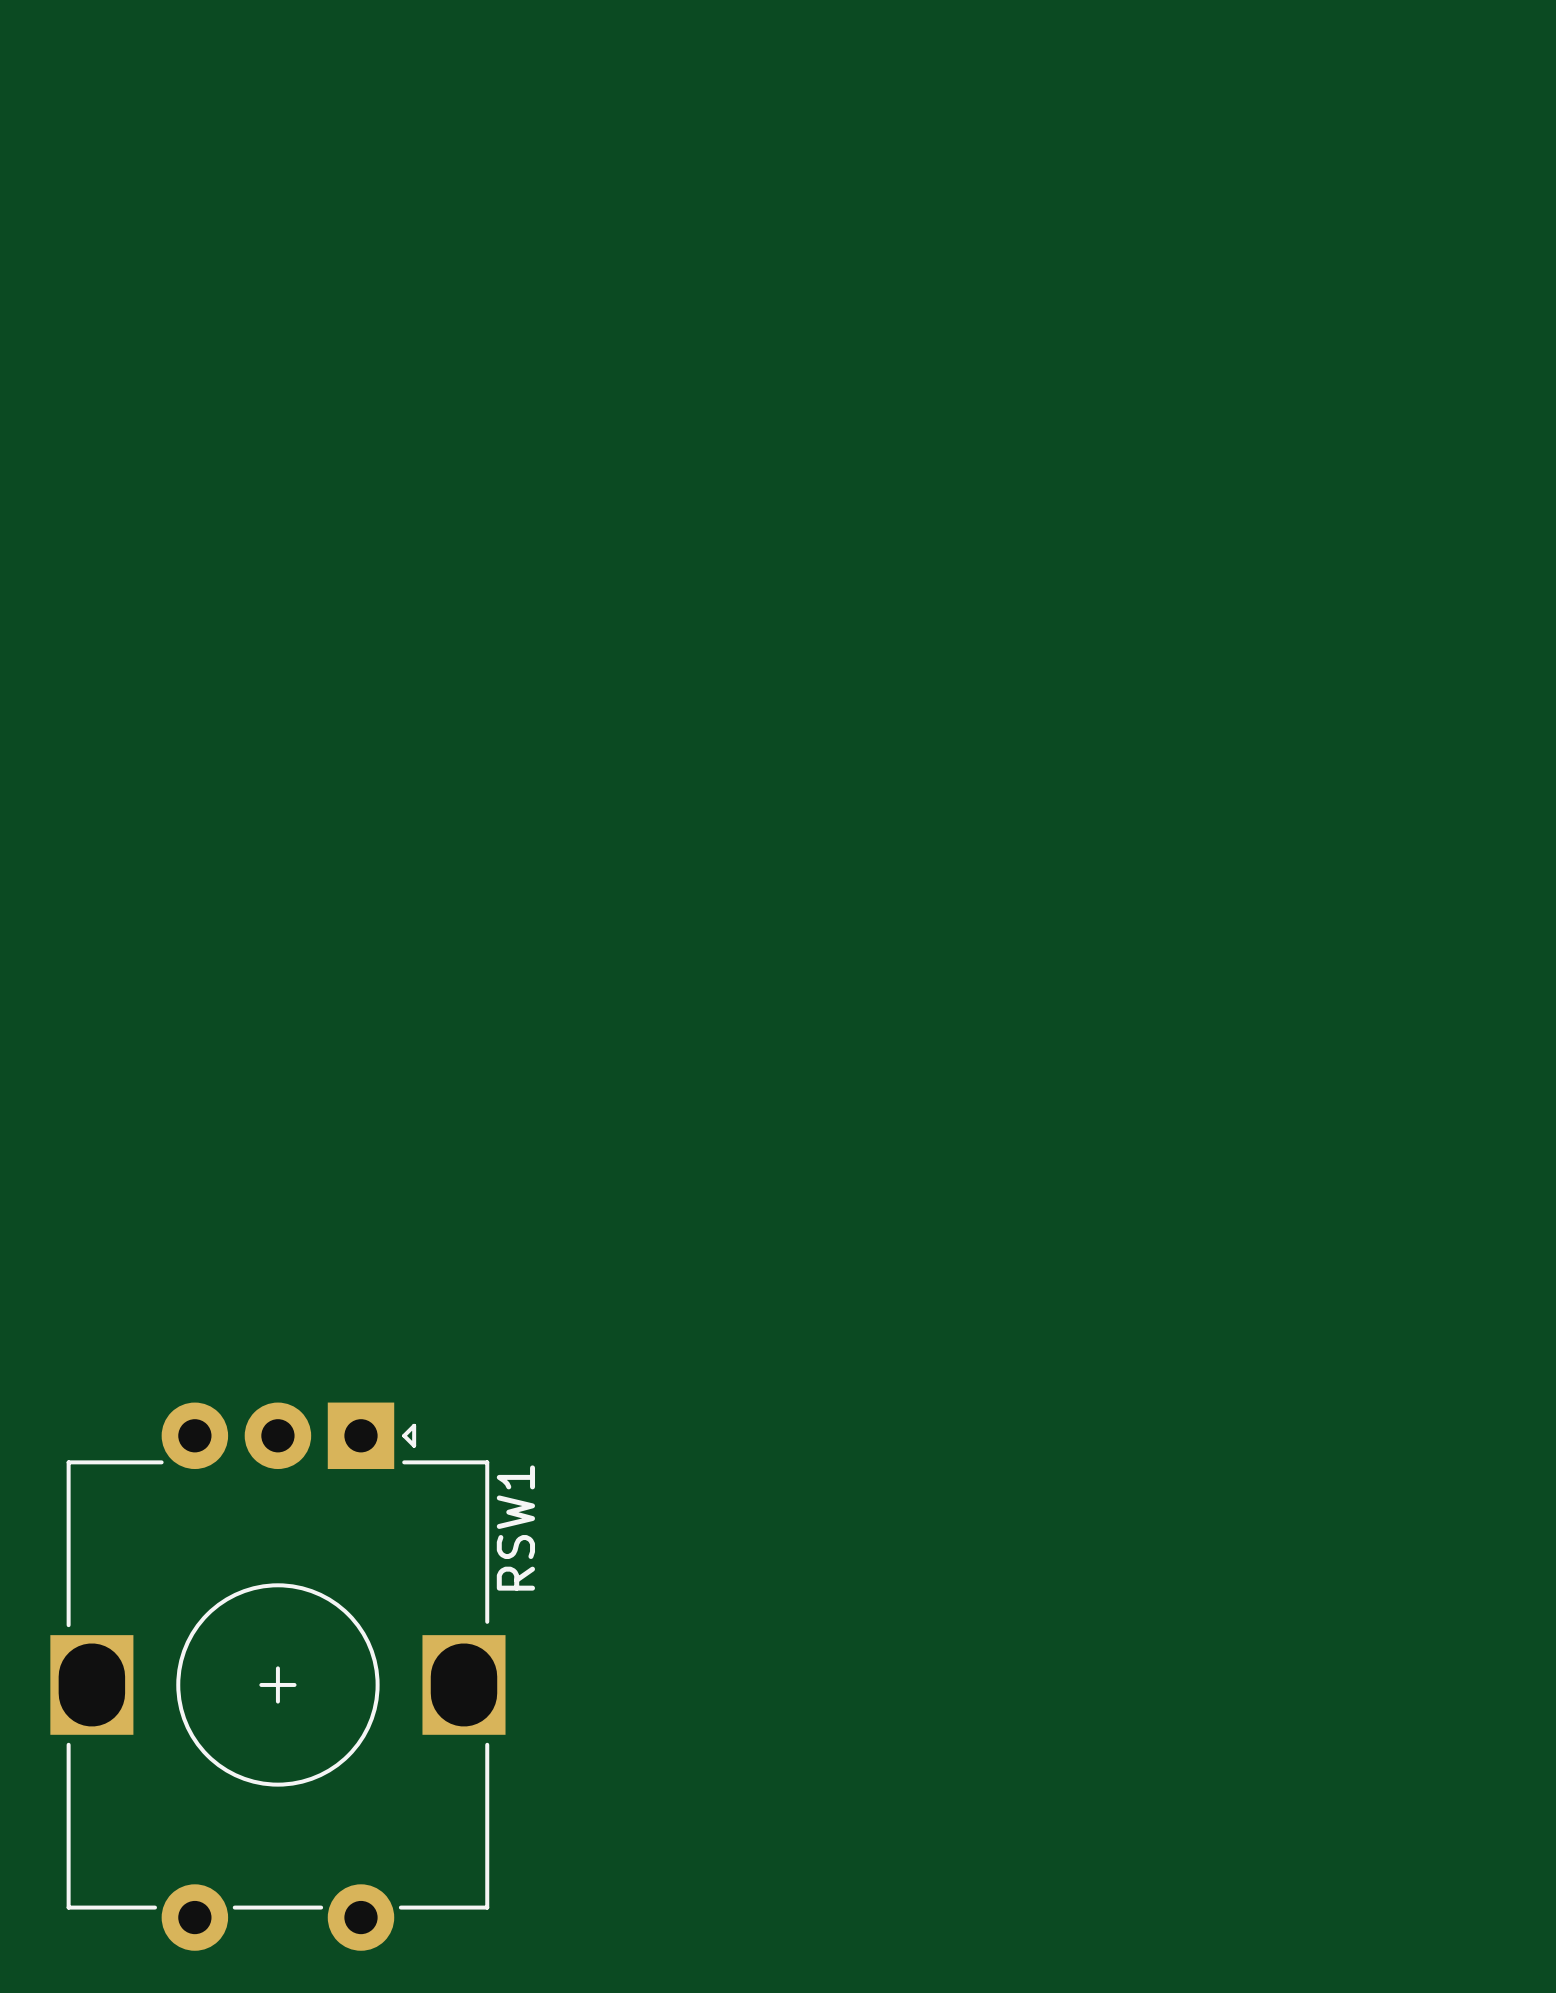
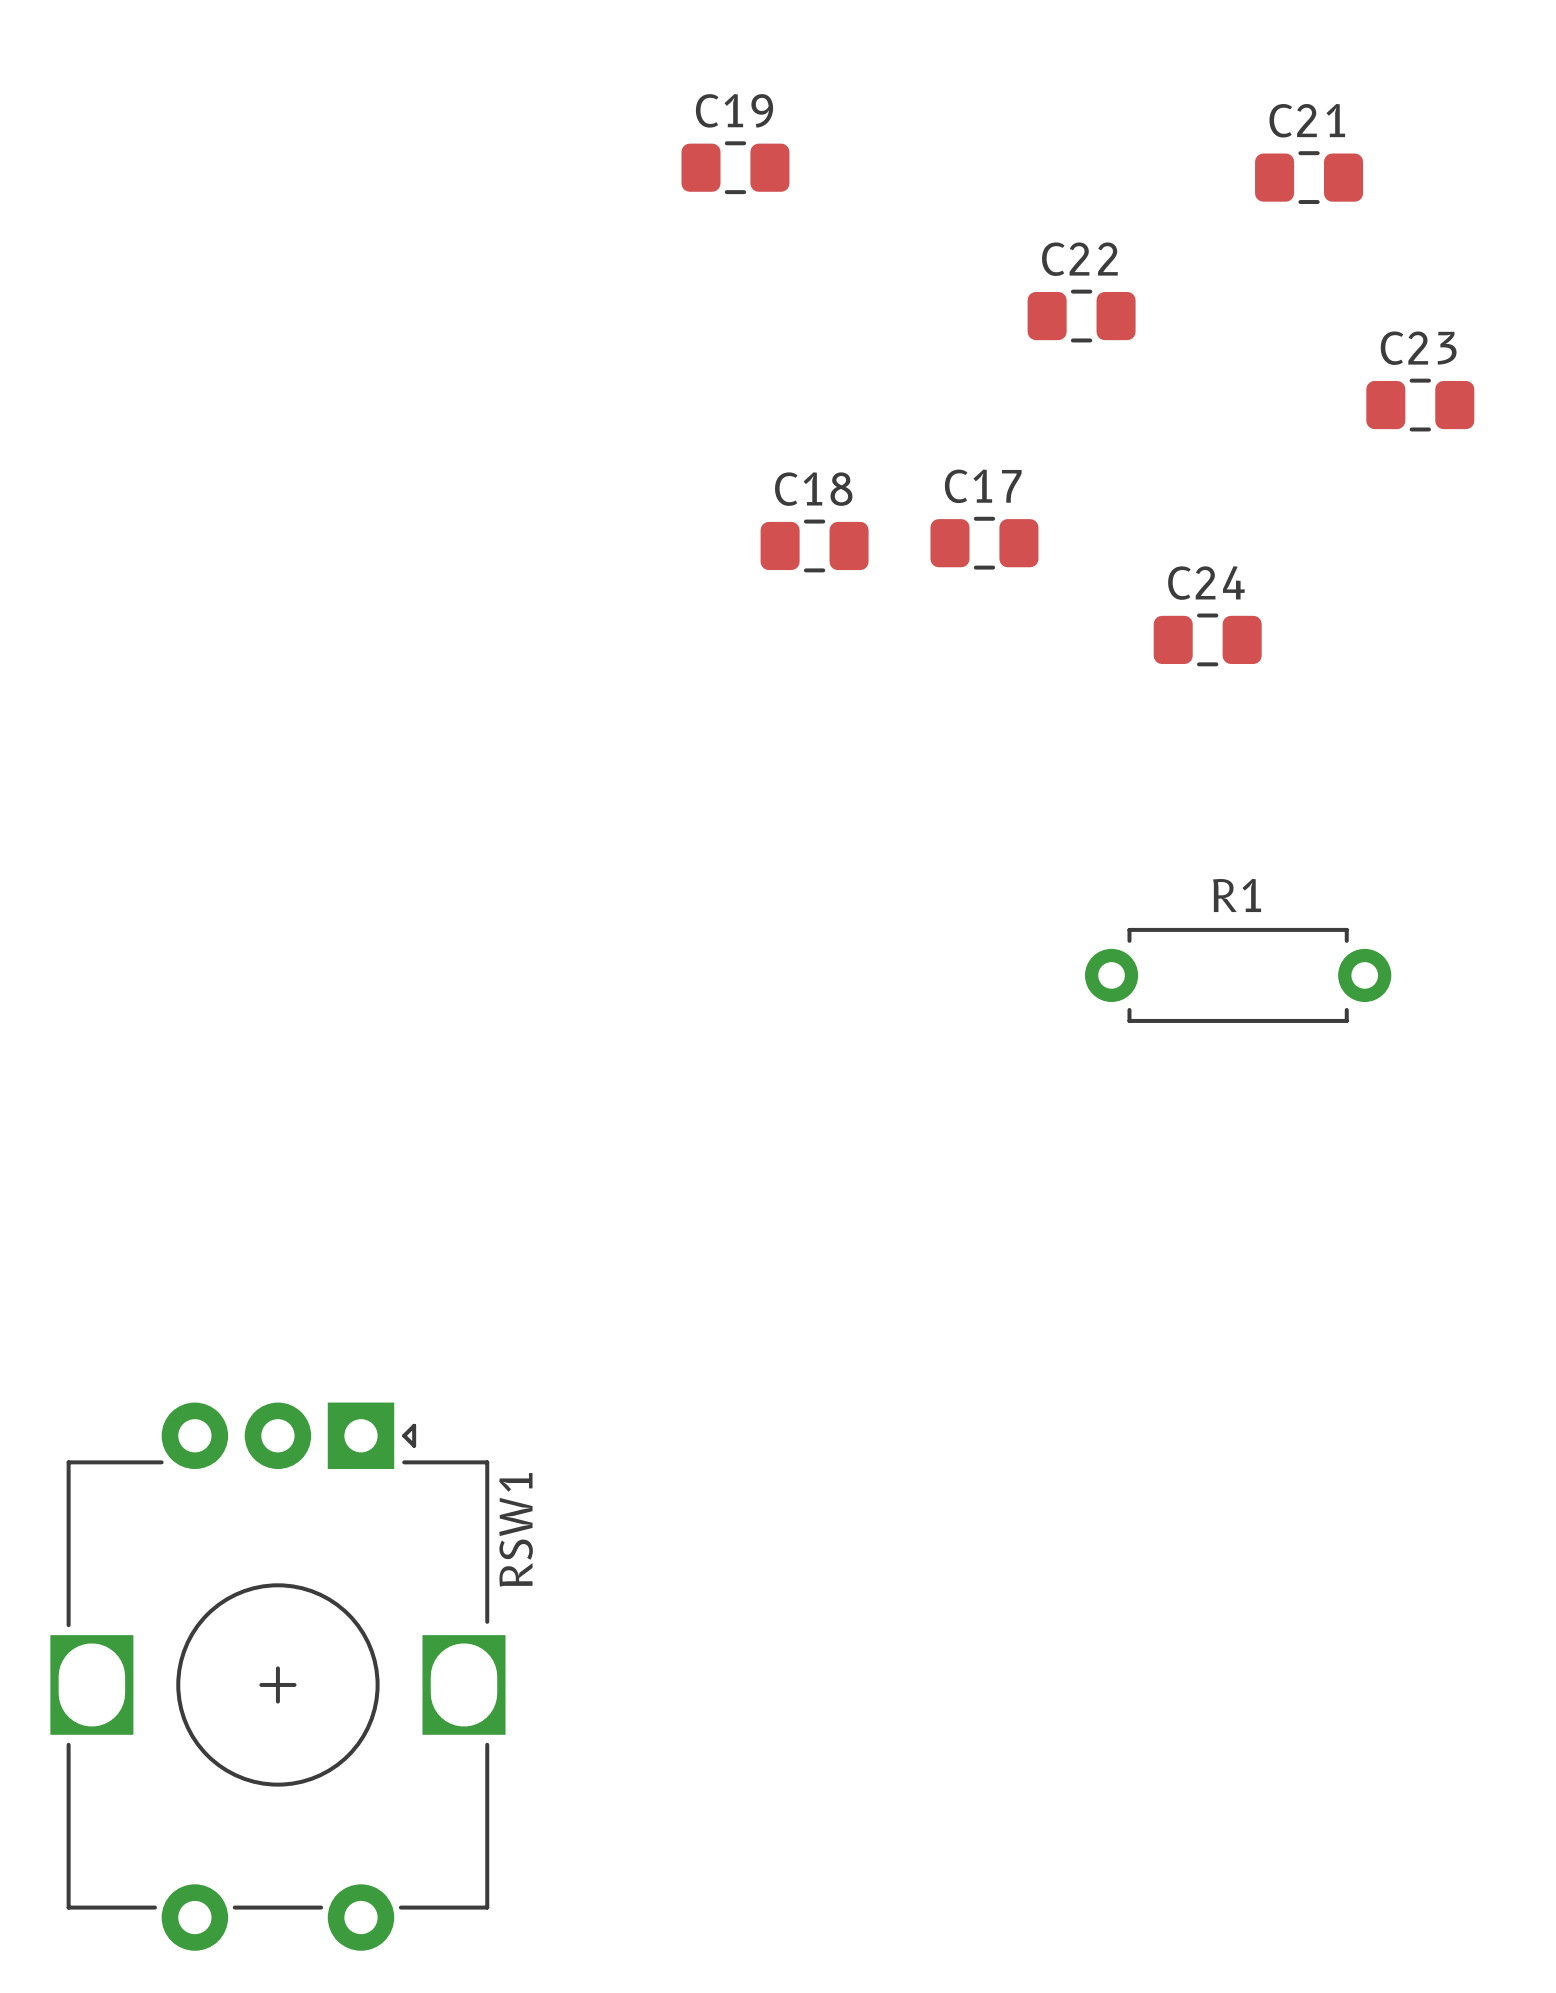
C19: none -> (735, 167)
C21: none -> (1309, 177)
C22: none -> (1081, 316)
C23: none -> (1420, 405)
C17: none -> (984, 543)
C18: none -> (814, 545)
C24: none -> (1207, 639)
R1: none -> (1238, 975)

